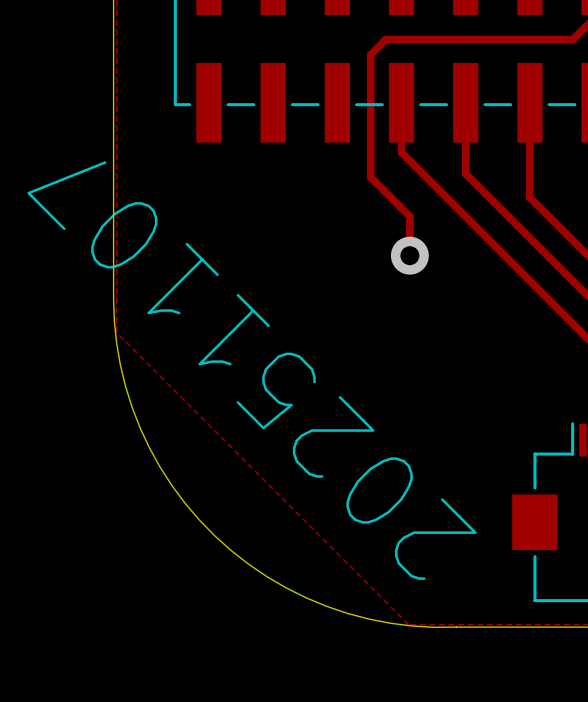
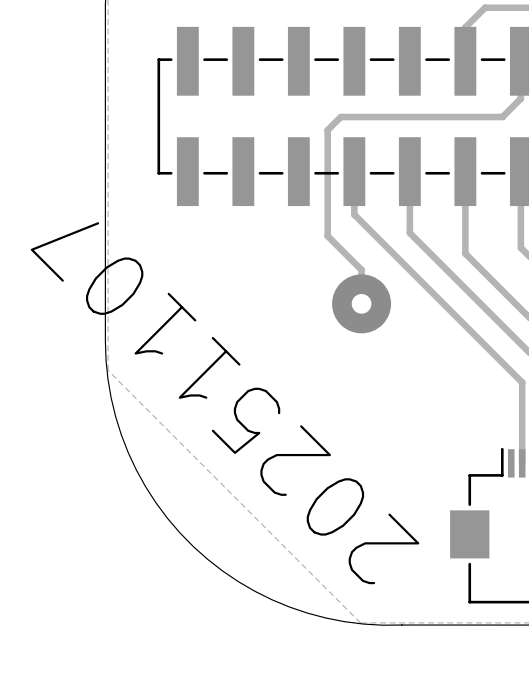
via size: [390, 236, 429, 275] -> [332, 274, 392, 334]

